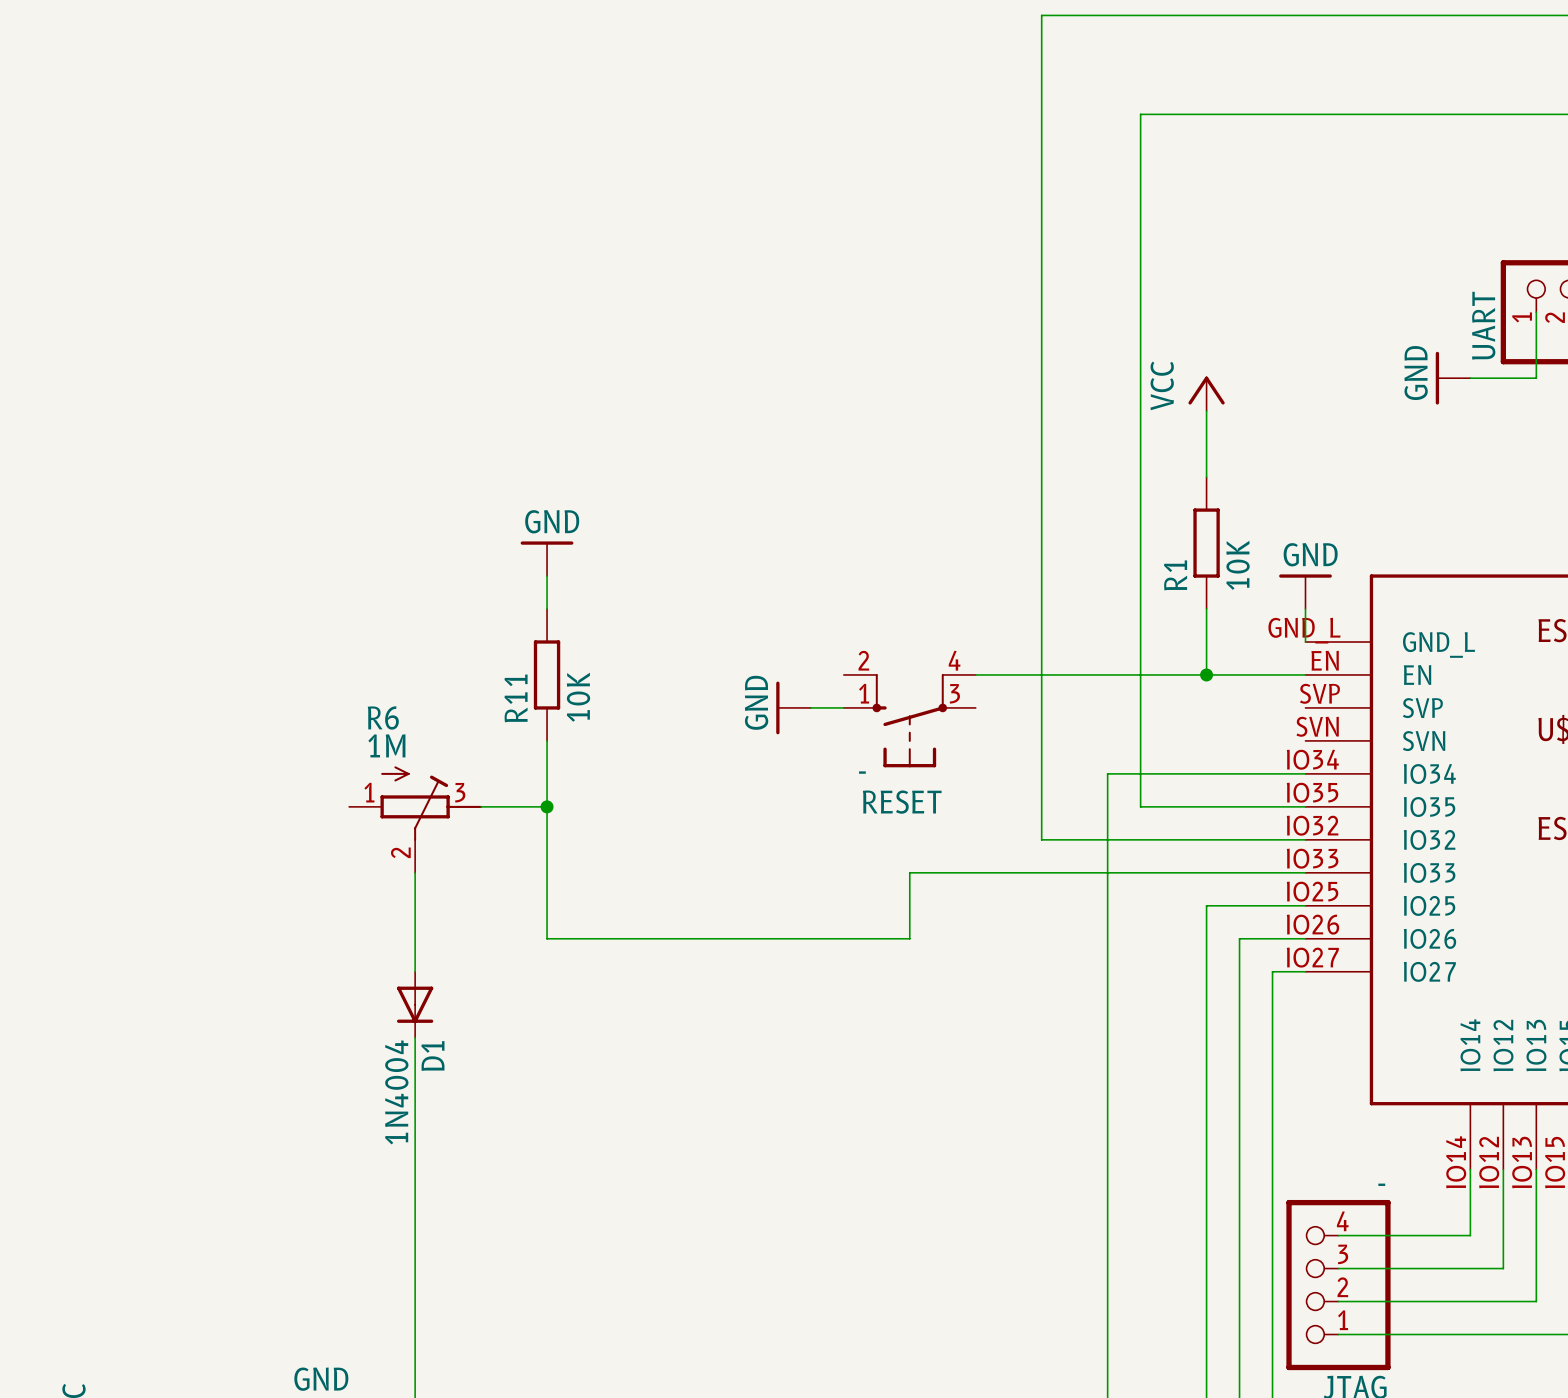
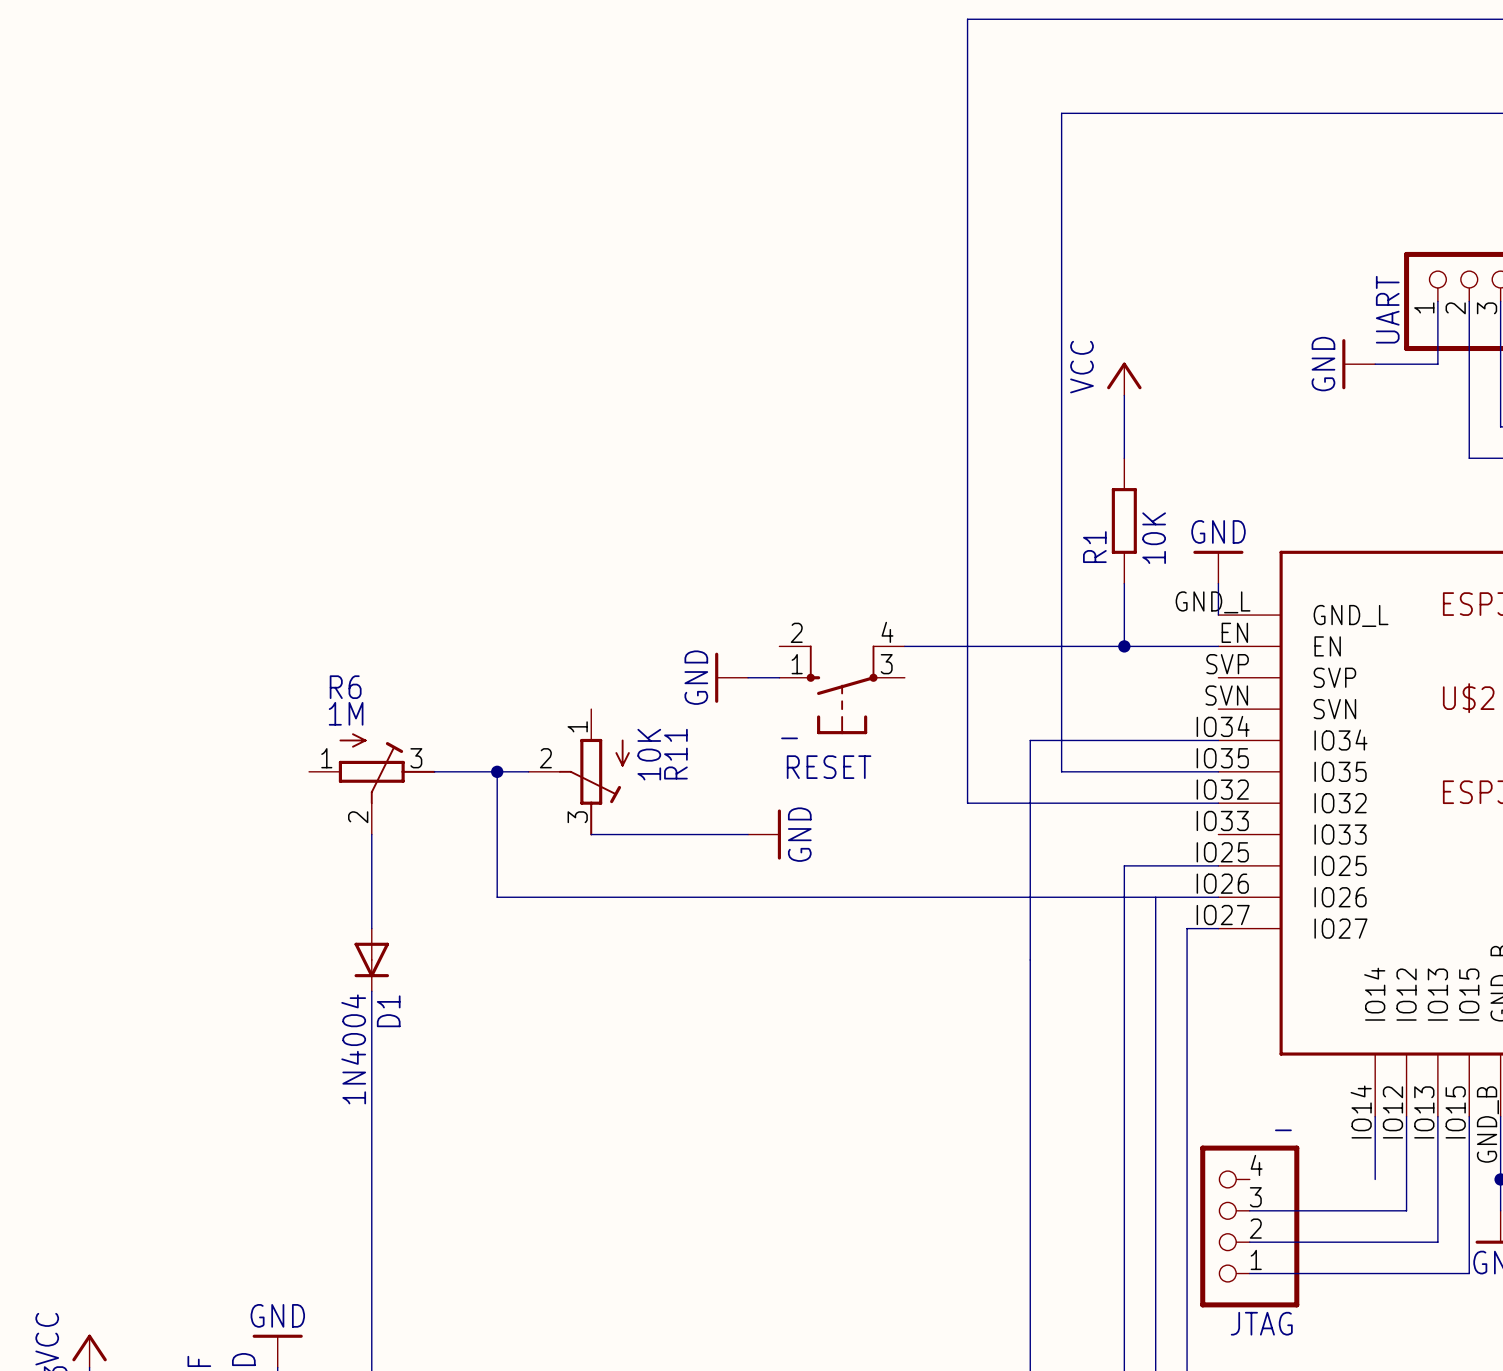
power symbol: GND (547, 558) -> none
wire: (547, 576) (547, 609) -> none
R11 symbol: [533, 609, 561, 741] -> [528, 709, 630, 836]
R11 value position: 10K (578, 697) -> 10K (649, 754)
R11 name position: R11 (516, 698) -> R11 (675, 754)
wire: (547, 740) (547, 806) -> (528, 771) (497, 771)
wire: none -> (591, 834) (748, 834)
power symbol: none -> GND (764, 834)
wire: (1305, 872) (909, 872) (909, 938) -> (1155, 897) (842, 897)
wire: (1338, 1235) (1470, 1235) -> none

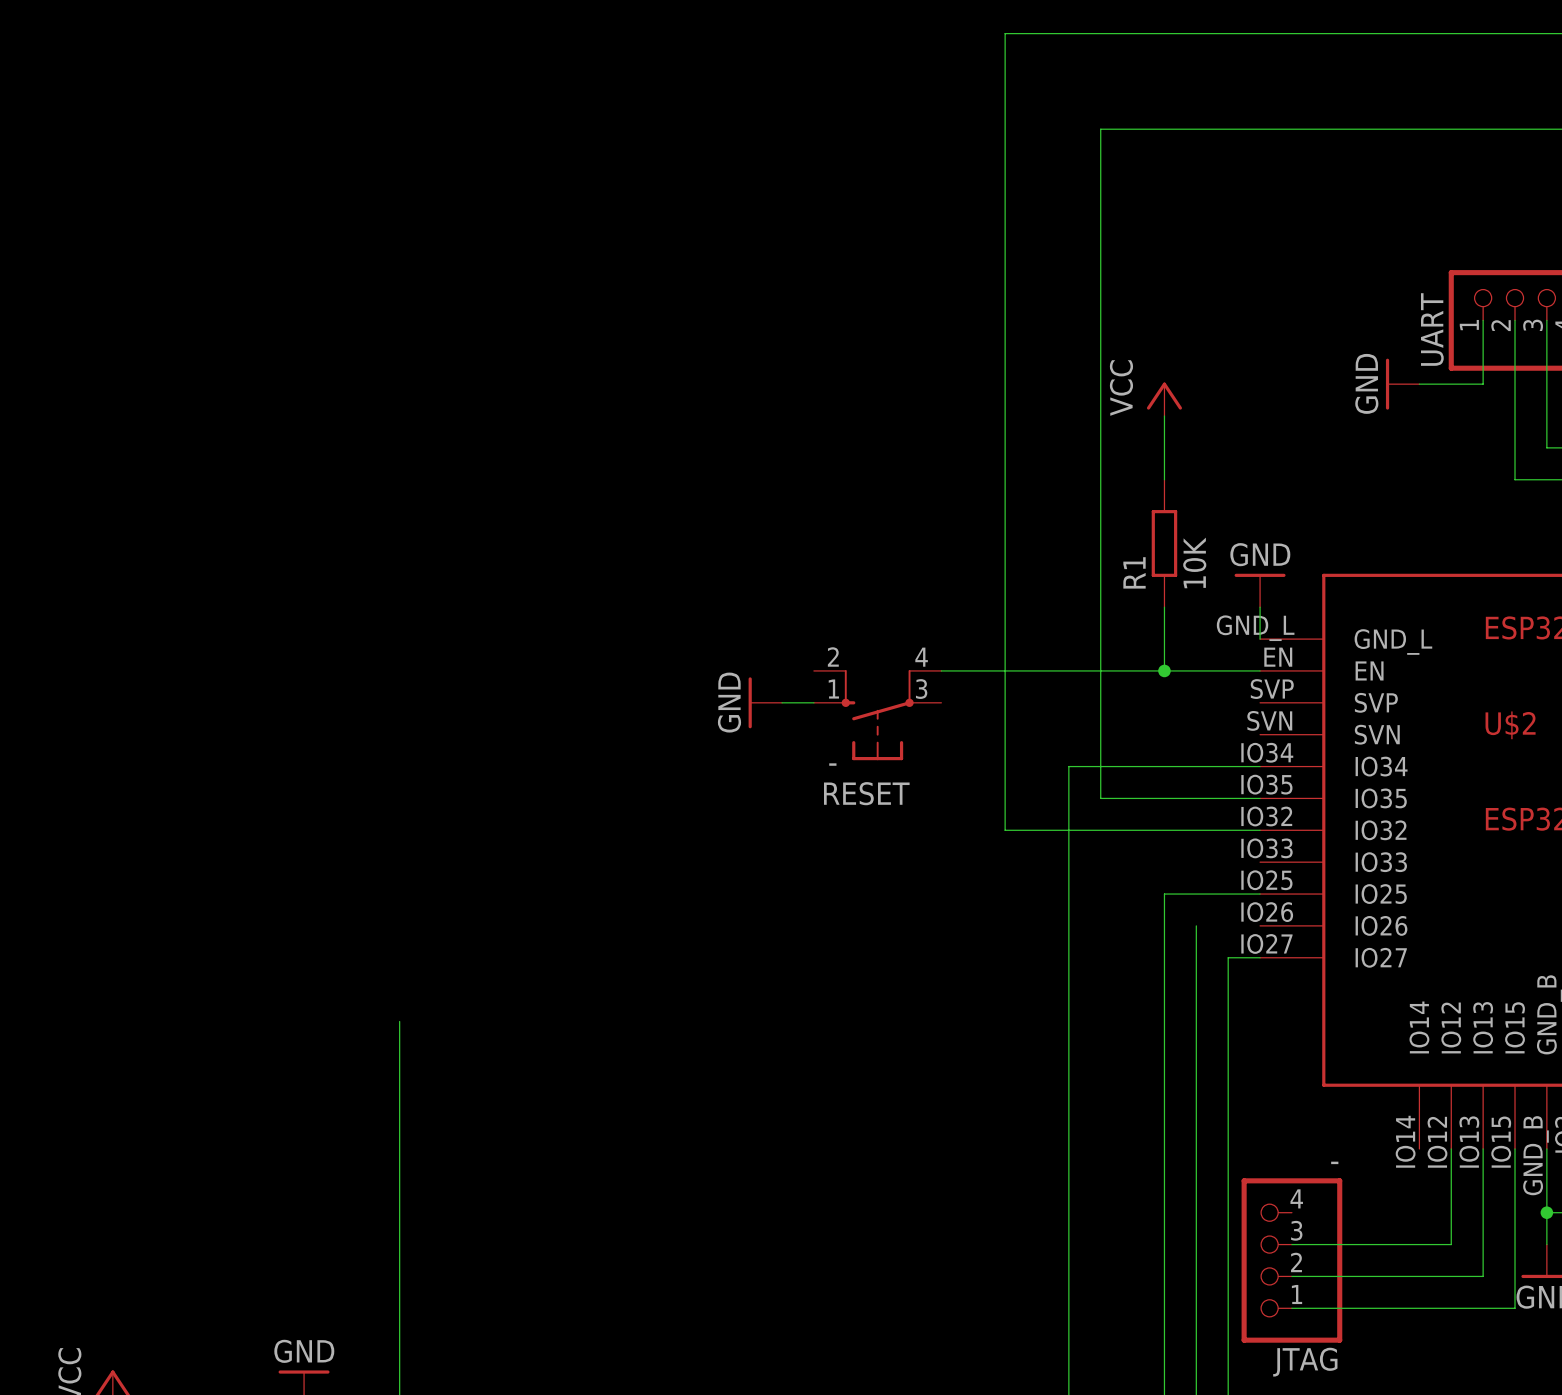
wire: (434, 771) (528, 771) -> none
wire: (497, 771) (497, 897) (1218, 897) -> none
junction: (497, 771) -> none
R11: 10K (579, 772) -> none
R6: 1M (372, 783) -> none
wire: (371, 834) (371, 928) -> none
wire: (591, 834) (748, 834) -> none
power symbol: GND (764, 834) -> none
D1: 1N4004 (371, 959) -> none
wire: (1375, 1116) (1375, 1179) -> none

